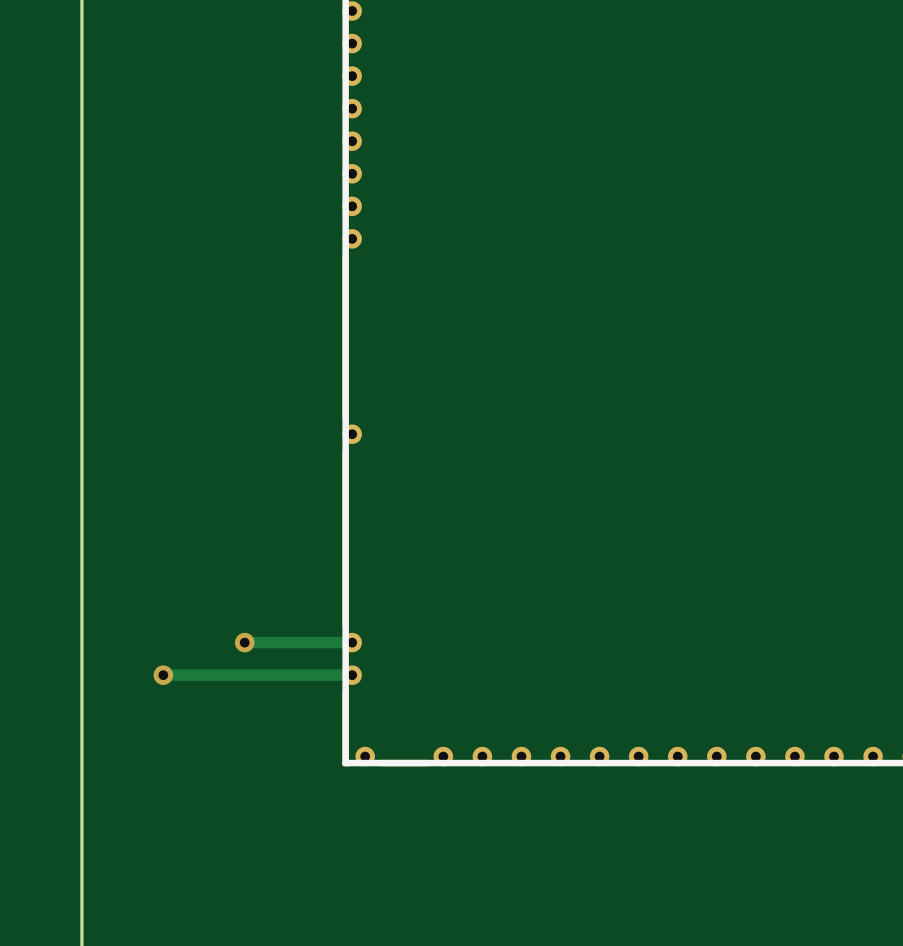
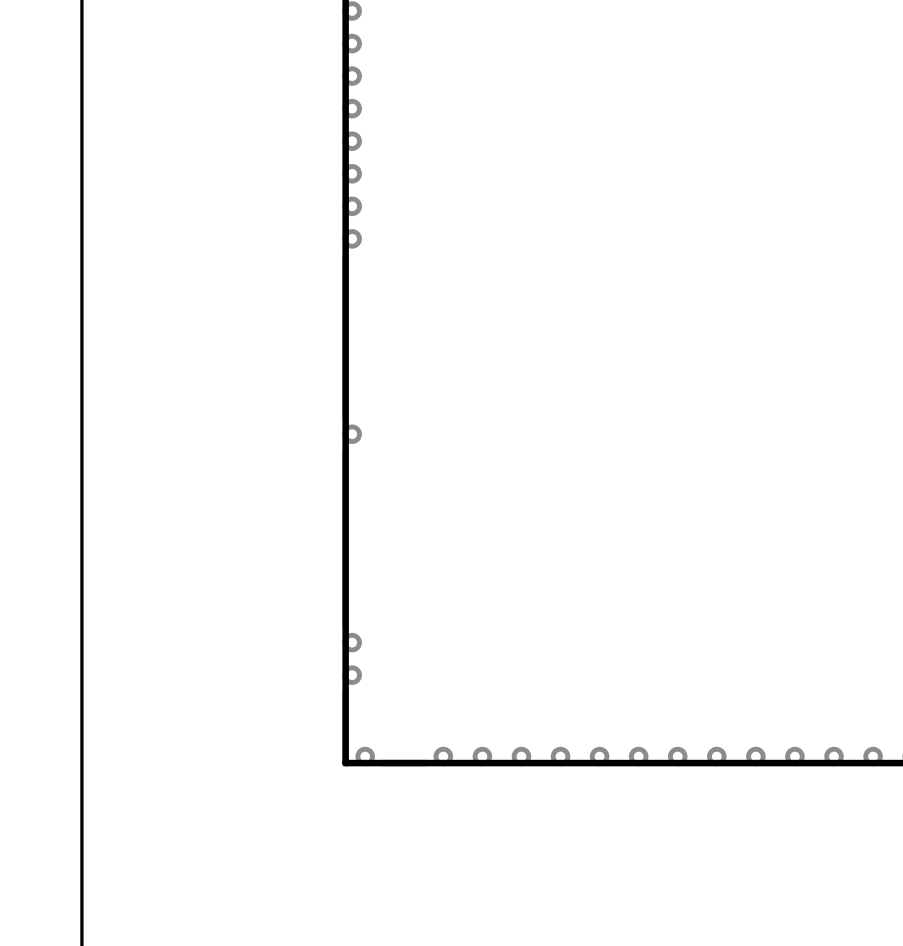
track: (244, 642) (352, 642) -> none
via: (244, 642) -> none
track: (163, 675) (352, 675) -> none
via: (163, 675) -> none

